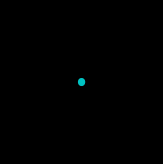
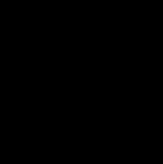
line: (81, 81) (81, 82) -> none

